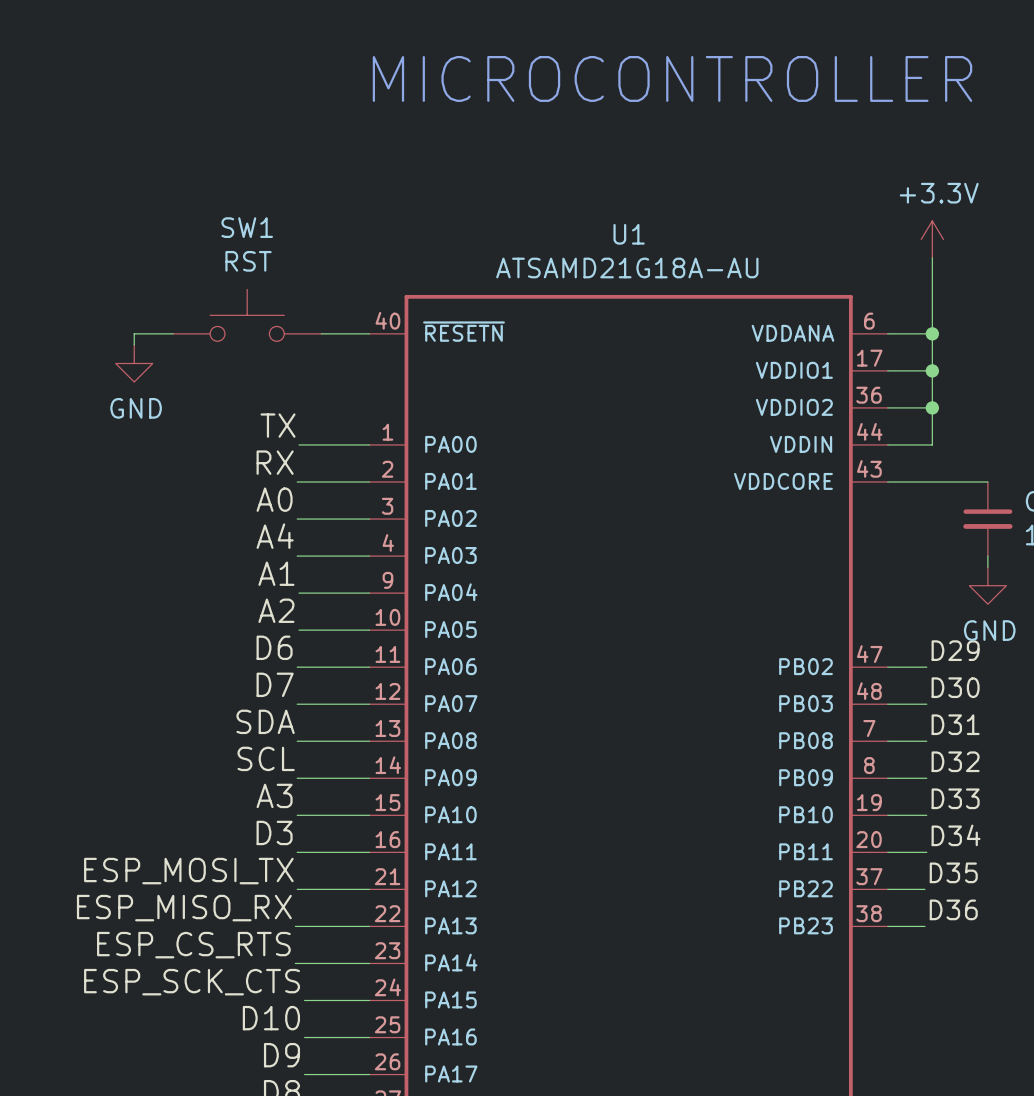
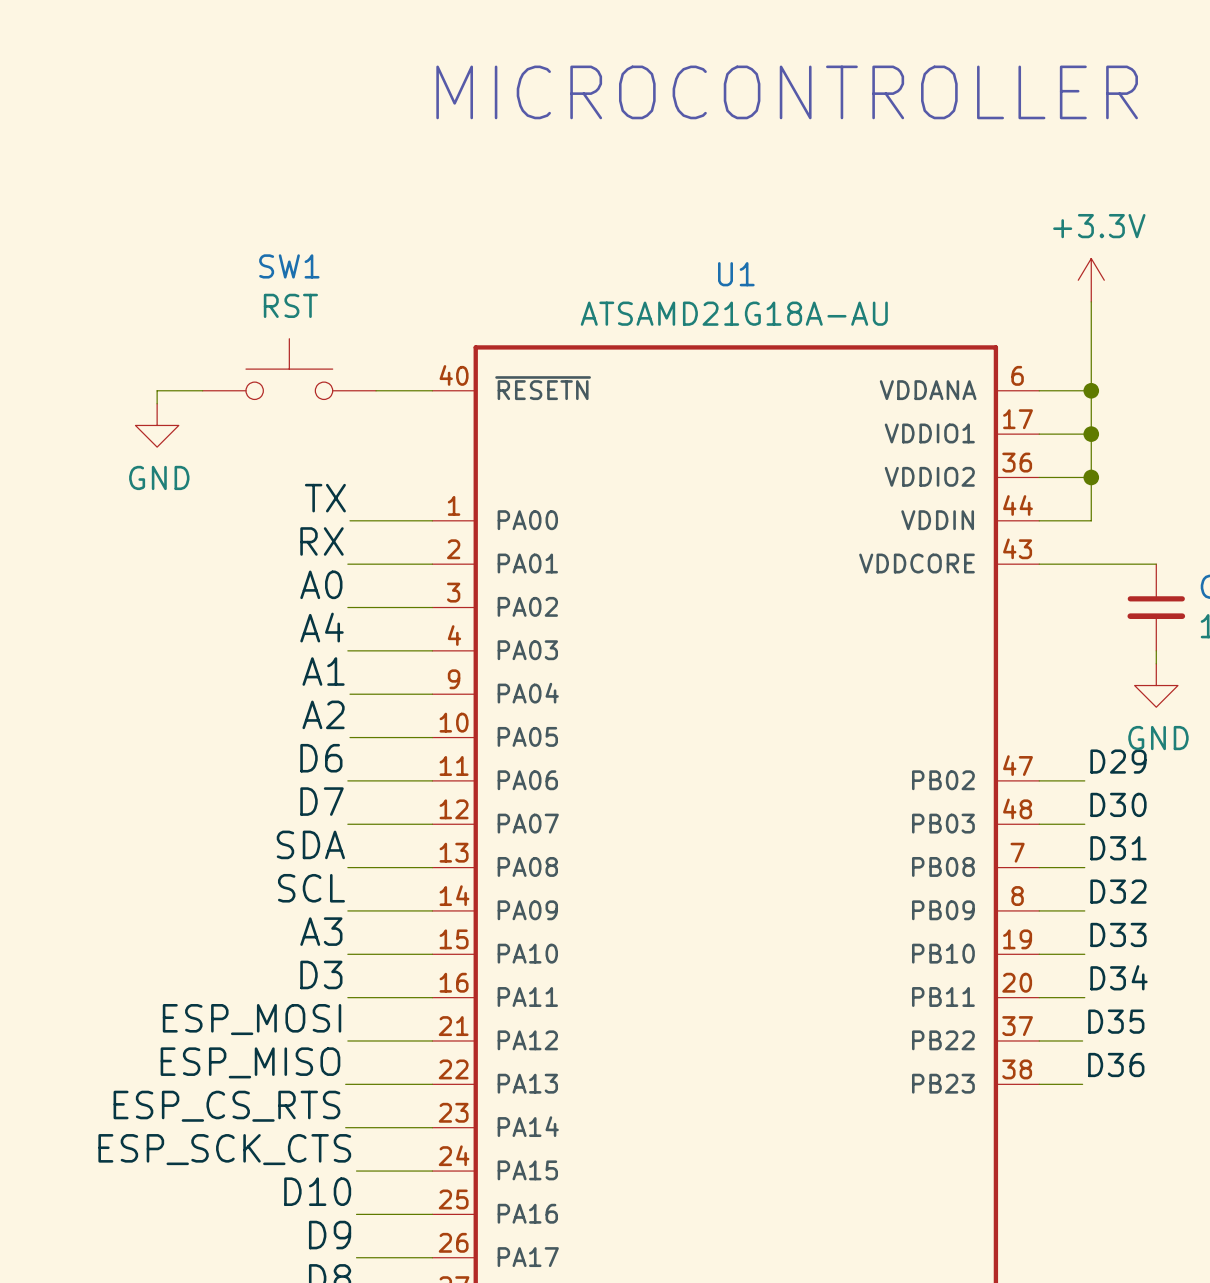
label: ESP_MOSI_TX (188, 871) -> ESP_MOSI (252, 1019)
label: ESP_MISO_RX (184, 908) -> ESP_MISO (250, 1062)

